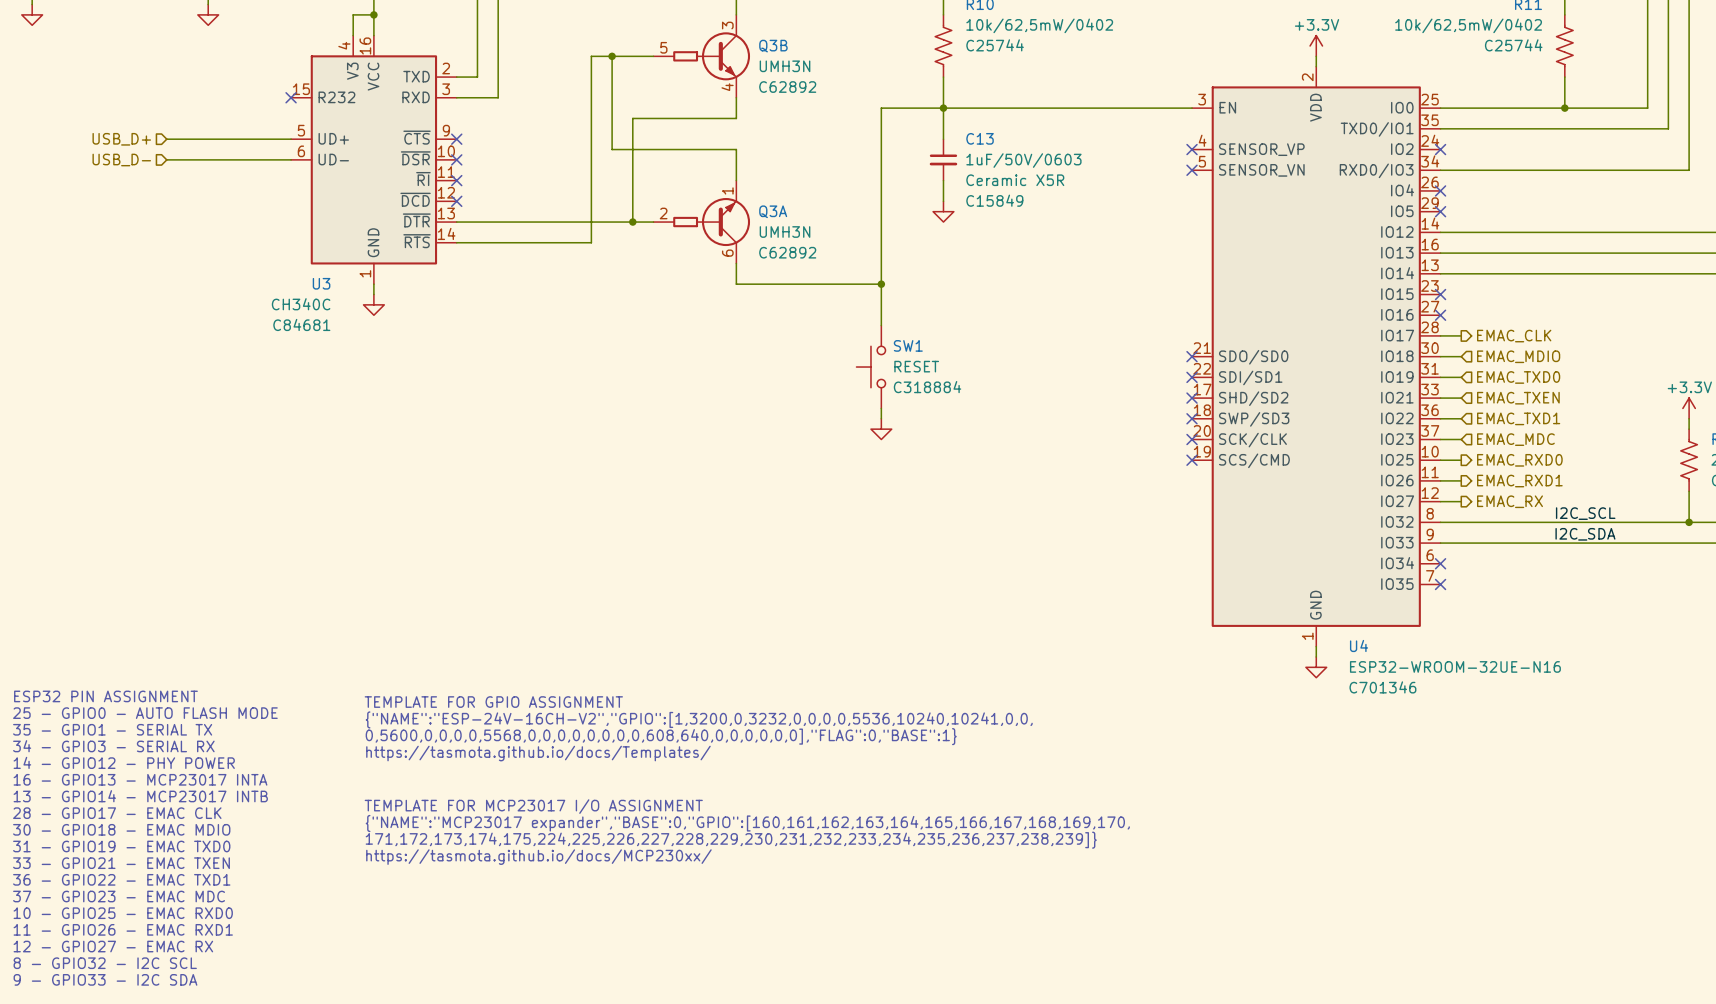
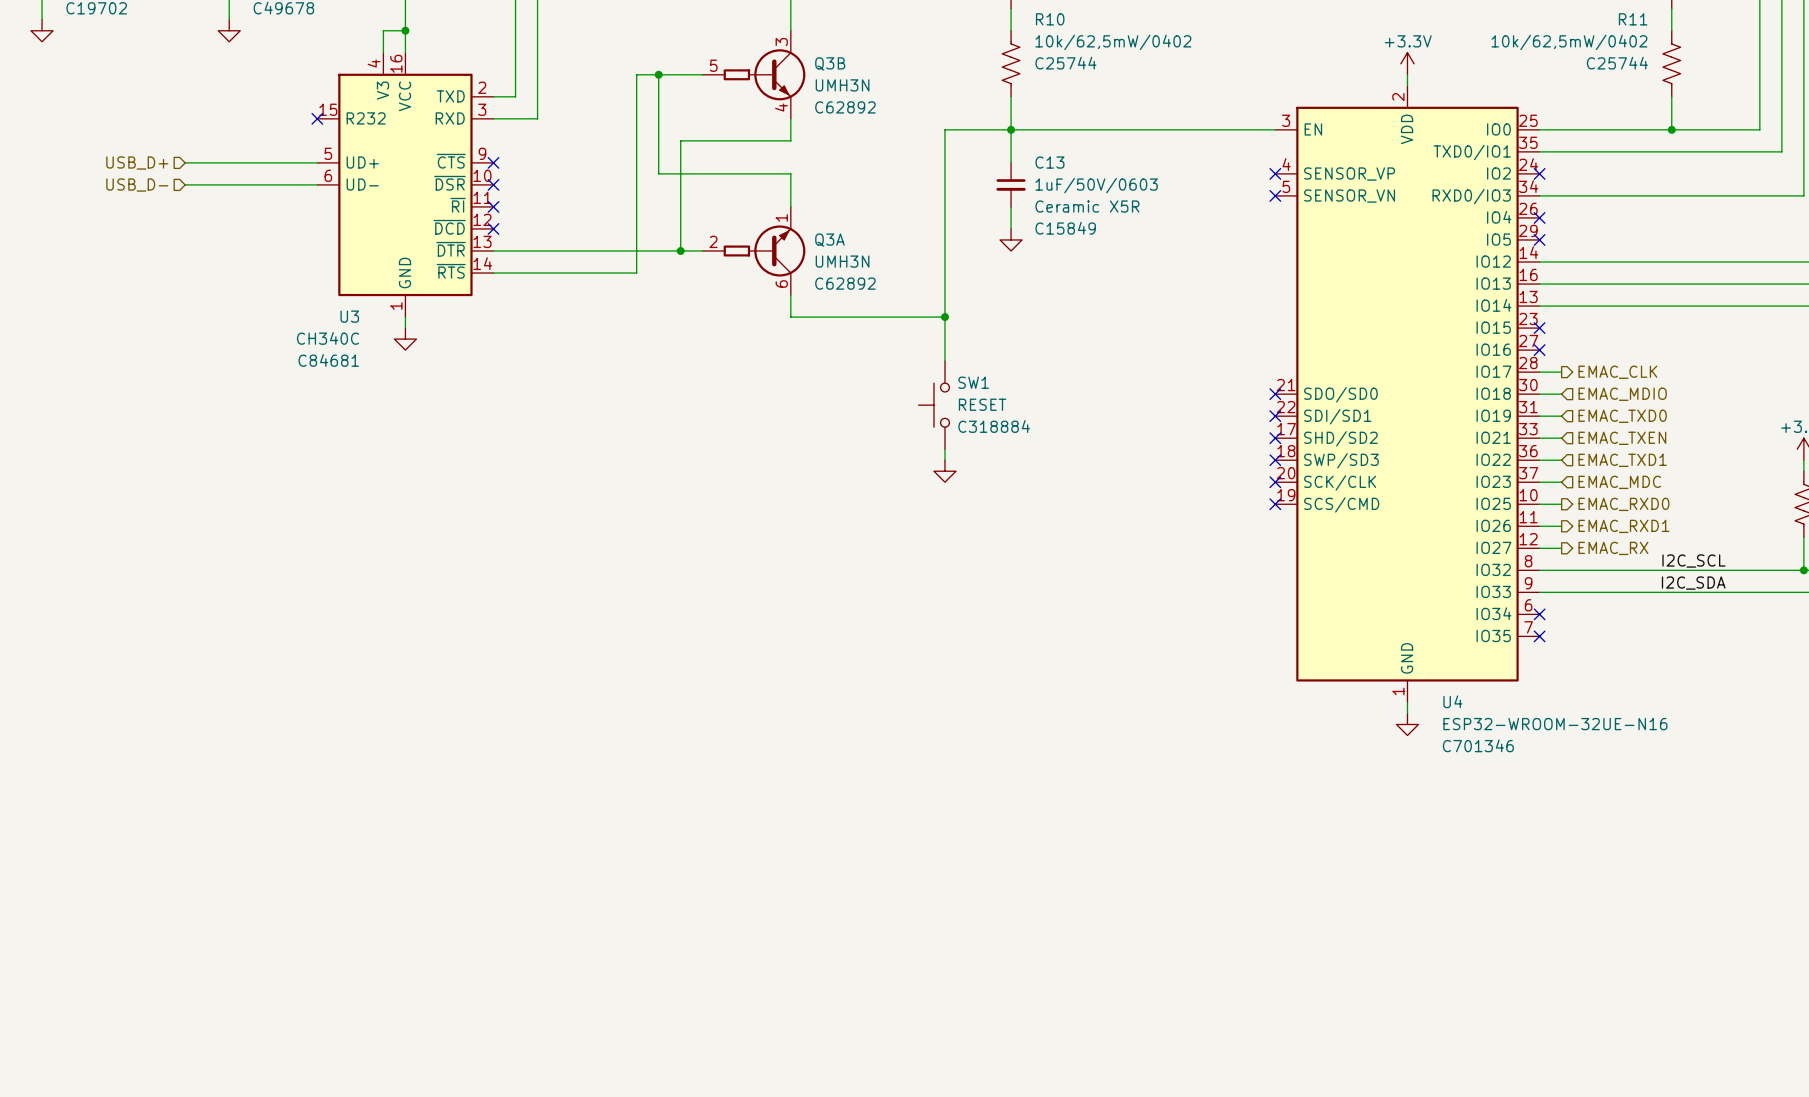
text: ESP32 PIN ASSIGNMENT (105, 696) -> none
text: TEMPLATE FOR GPIO ASSIGNMENT (493, 702) -> none
text: 25 - GPIO0 - AUTO FLASH MODE (145, 713) -> none
text: {"NAME":"ESP-24V-16CH-V2","GPIO":[1,3200,0,3232,0,0,0,0,5536,10240,10241,0,0, (699, 719) -> none
text: 35 - GPIO1 - SERIAL TX (112, 729) -> none
text: 0,5600,0,0,0,0,5568,0,0,0,0,0,0,0,0,608,640,0,0,0,0,0,0],"FLAG":0,"BASE":1} (661, 736) -> none
text: 34 - GPIO3 - SERIAL RX (113, 746) -> none
text: https://tasmota.github.io/docs/Templates/ (538, 753) -> none
text: 14 - GPIO12 - PHY POWER (124, 762) -> none
text: 16 - GPIO13 - MCP23017 INTA (140, 779) -> none
text: 13 - GPIO14 - MCP23017 INTB (140, 796) -> none
text: TEMPLATE FOR MCP23017 I/O ASSIGNMENT (533, 806) -> none
text: 28 - GPIO17 - EMAC CLK (117, 813) -> none
text: {"NAME":"MCP23017 expander","BASE":0,"GPIO":[160,161,162,163,164,165,166,167,168,169,170, (747, 823) -> none
text: 30 - GPIO18 - EMAC MDIO (121, 829) -> none
text: 171,172,173,174,175,224,225,226,227,228,229,230,231,232,233,234,235,236,237,238,239]} (731, 840) -> none
text: 31 - GPIO19 - EMAC TXD0 (121, 846) -> none
text: https://tasmota.github.io/docs/MCP230xx/ (538, 857) -> none
text: 33 - GPIO21 - EMAC TXEN (121, 863) -> none
text: 36 - GPIO22 - EMAC TXD1 (121, 879) -> none
text: 37 - GPIO23 - EMAC MDC (119, 896) -> none
text: 10 - GPIO25 - EMAC RXD0 (123, 913) -> none
text: 11 - GPIO26 - EMAC RXD1 (123, 929) -> none
text: 12 - GPIO27 - EMAC RX (113, 946) -> none
text: 8 - GPIO32 - I2C SCL (105, 963) -> none
text: 9 - GPIO33 - I2C SDA (105, 979) -> none

